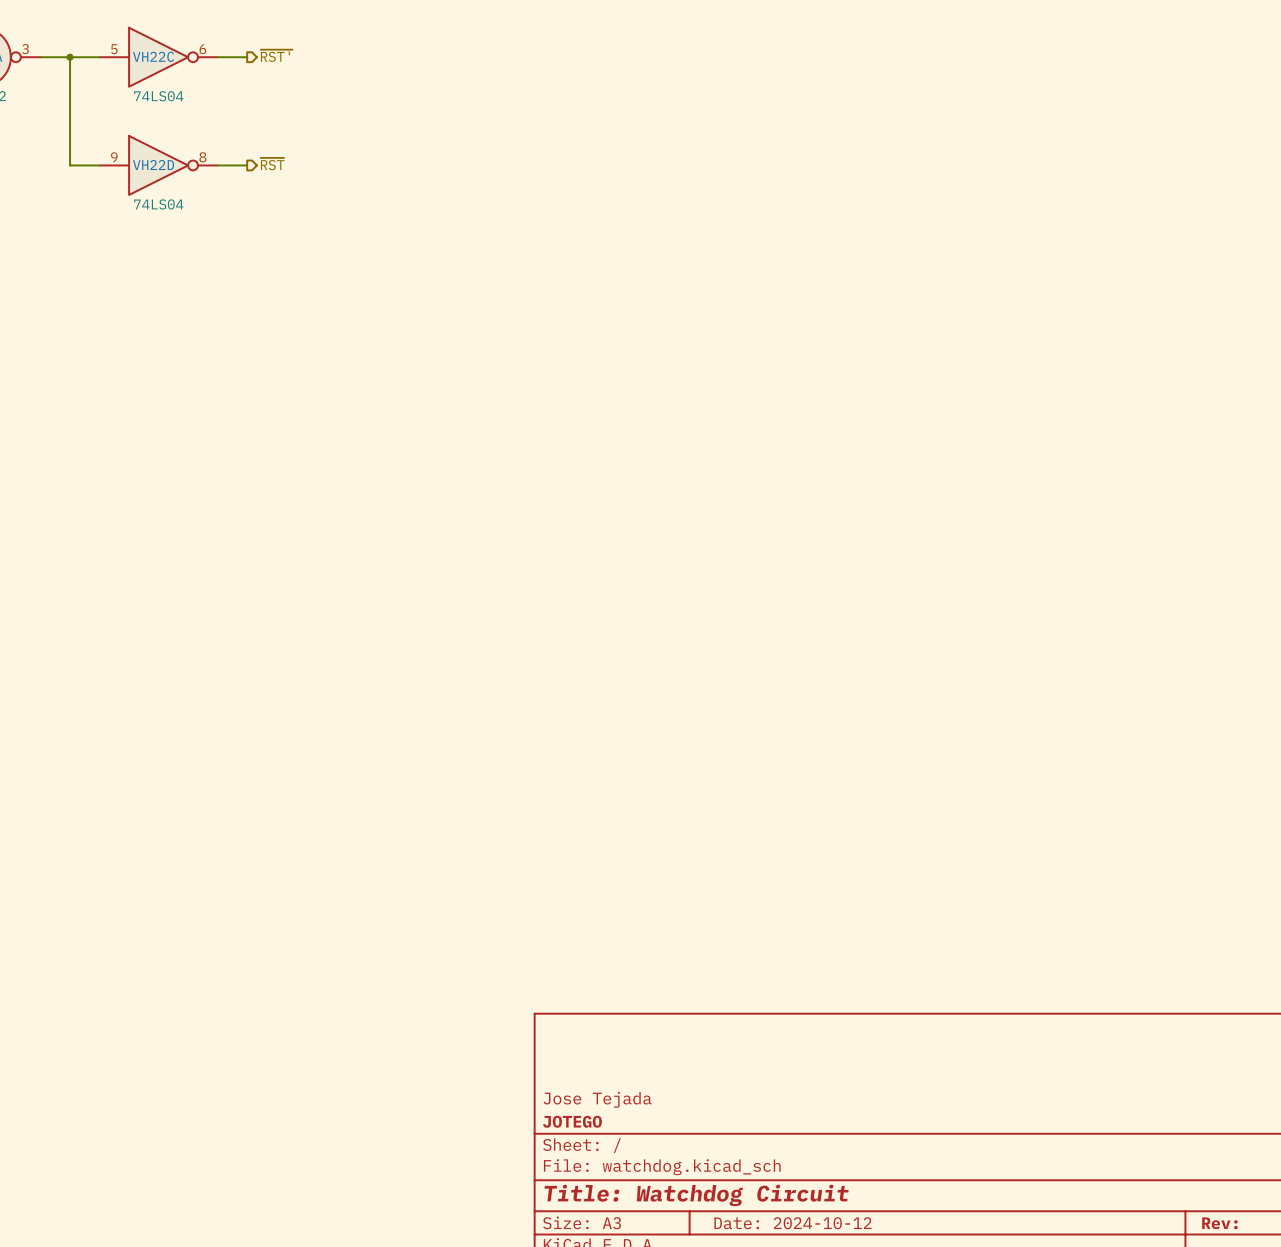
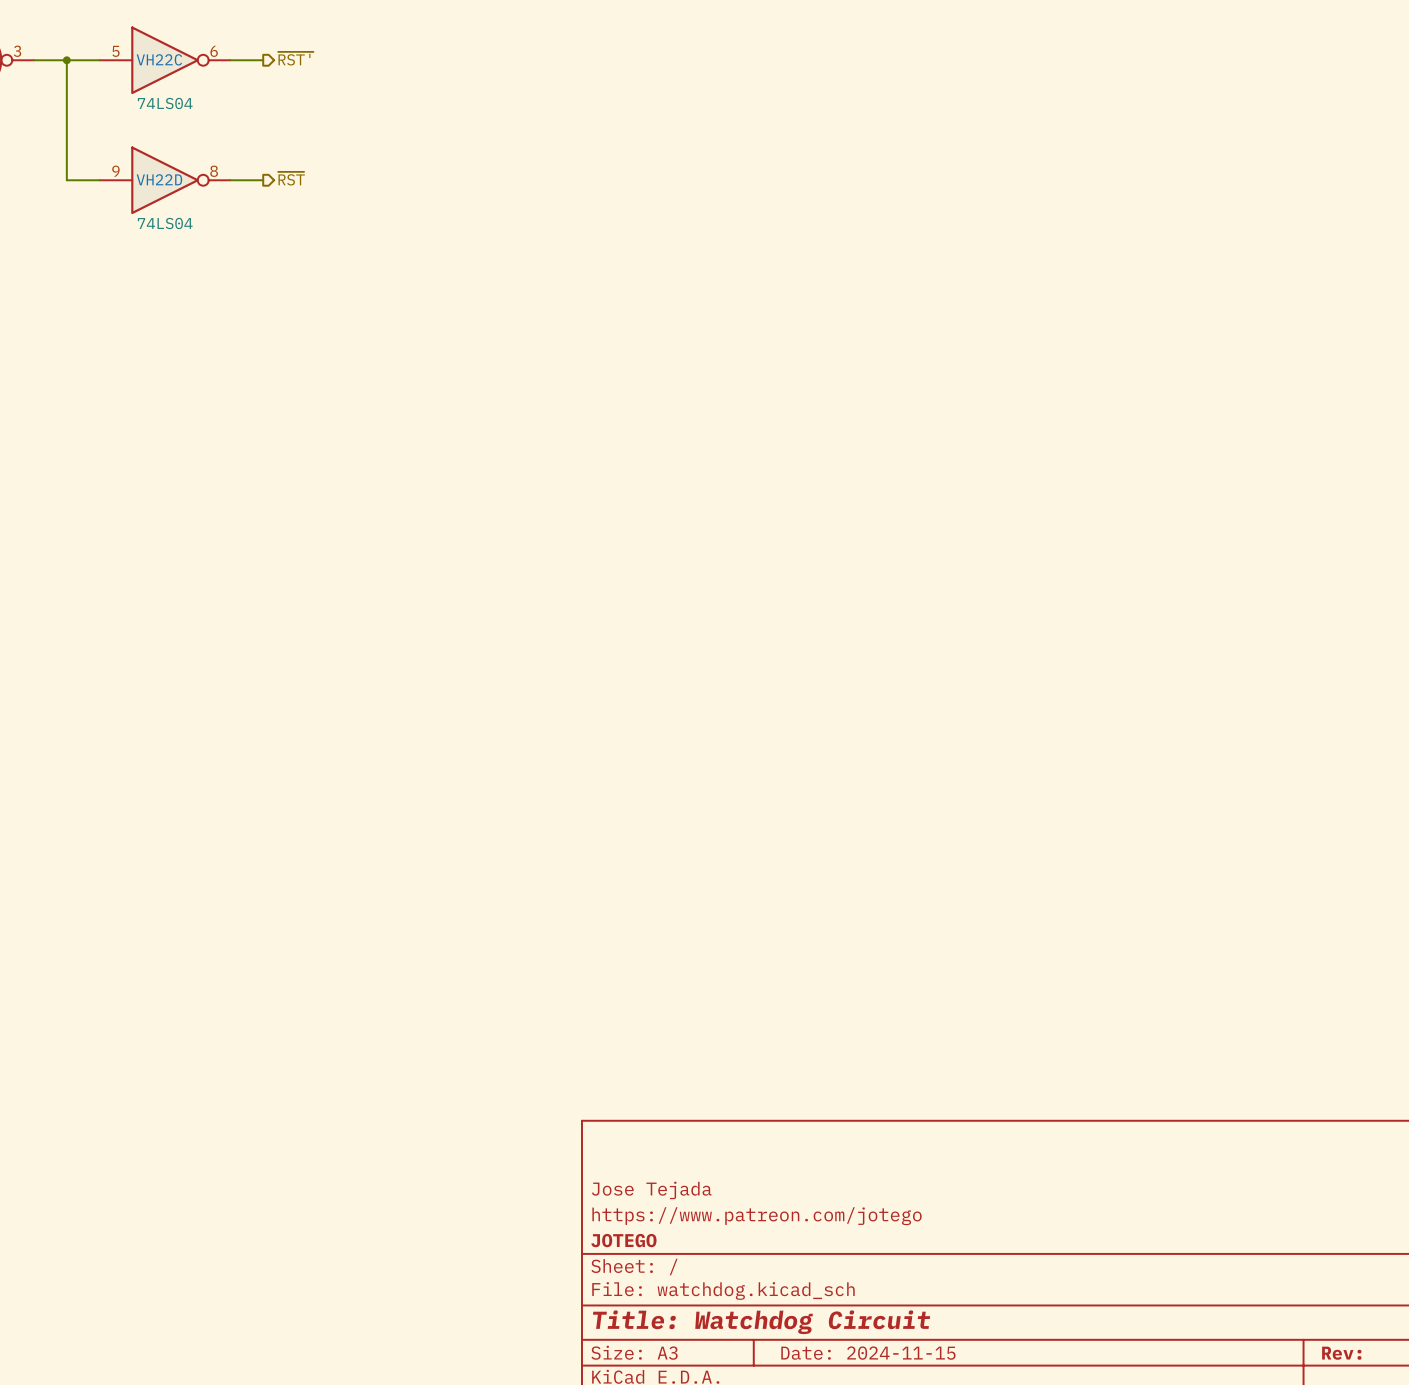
title block: none -> Jose Tejada (651, 1190)
title block: Jose Tejada (597, 1099) -> https://www.patreon.com/jotego (757, 1216)
title block: Date: 2024-10-12 (793, 1223) -> Date: 2024-11-15 (868, 1353)

